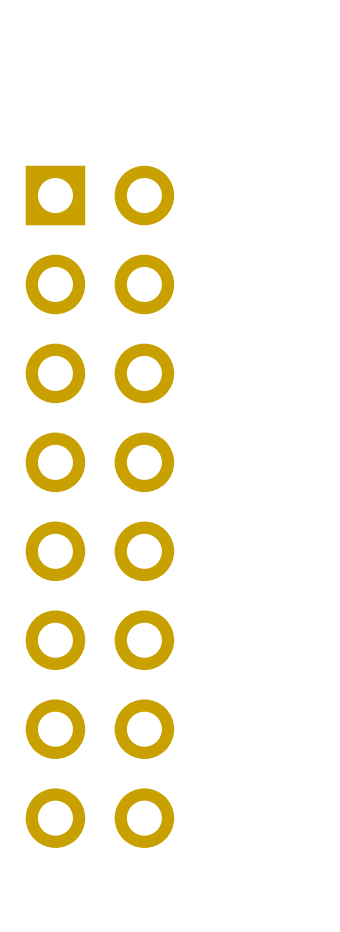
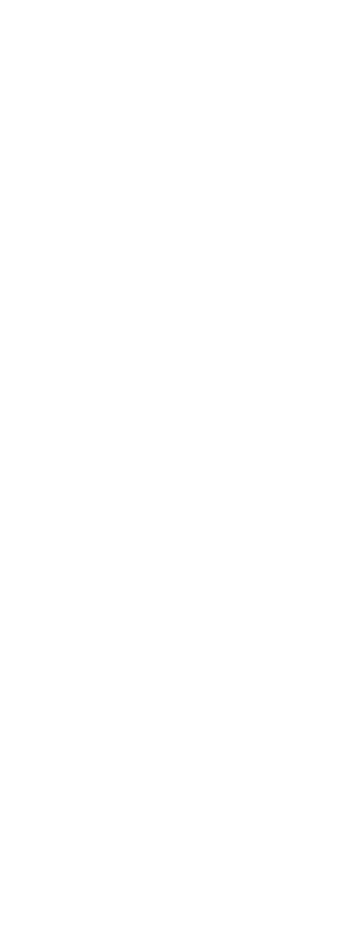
part: (99, 506) -> none

